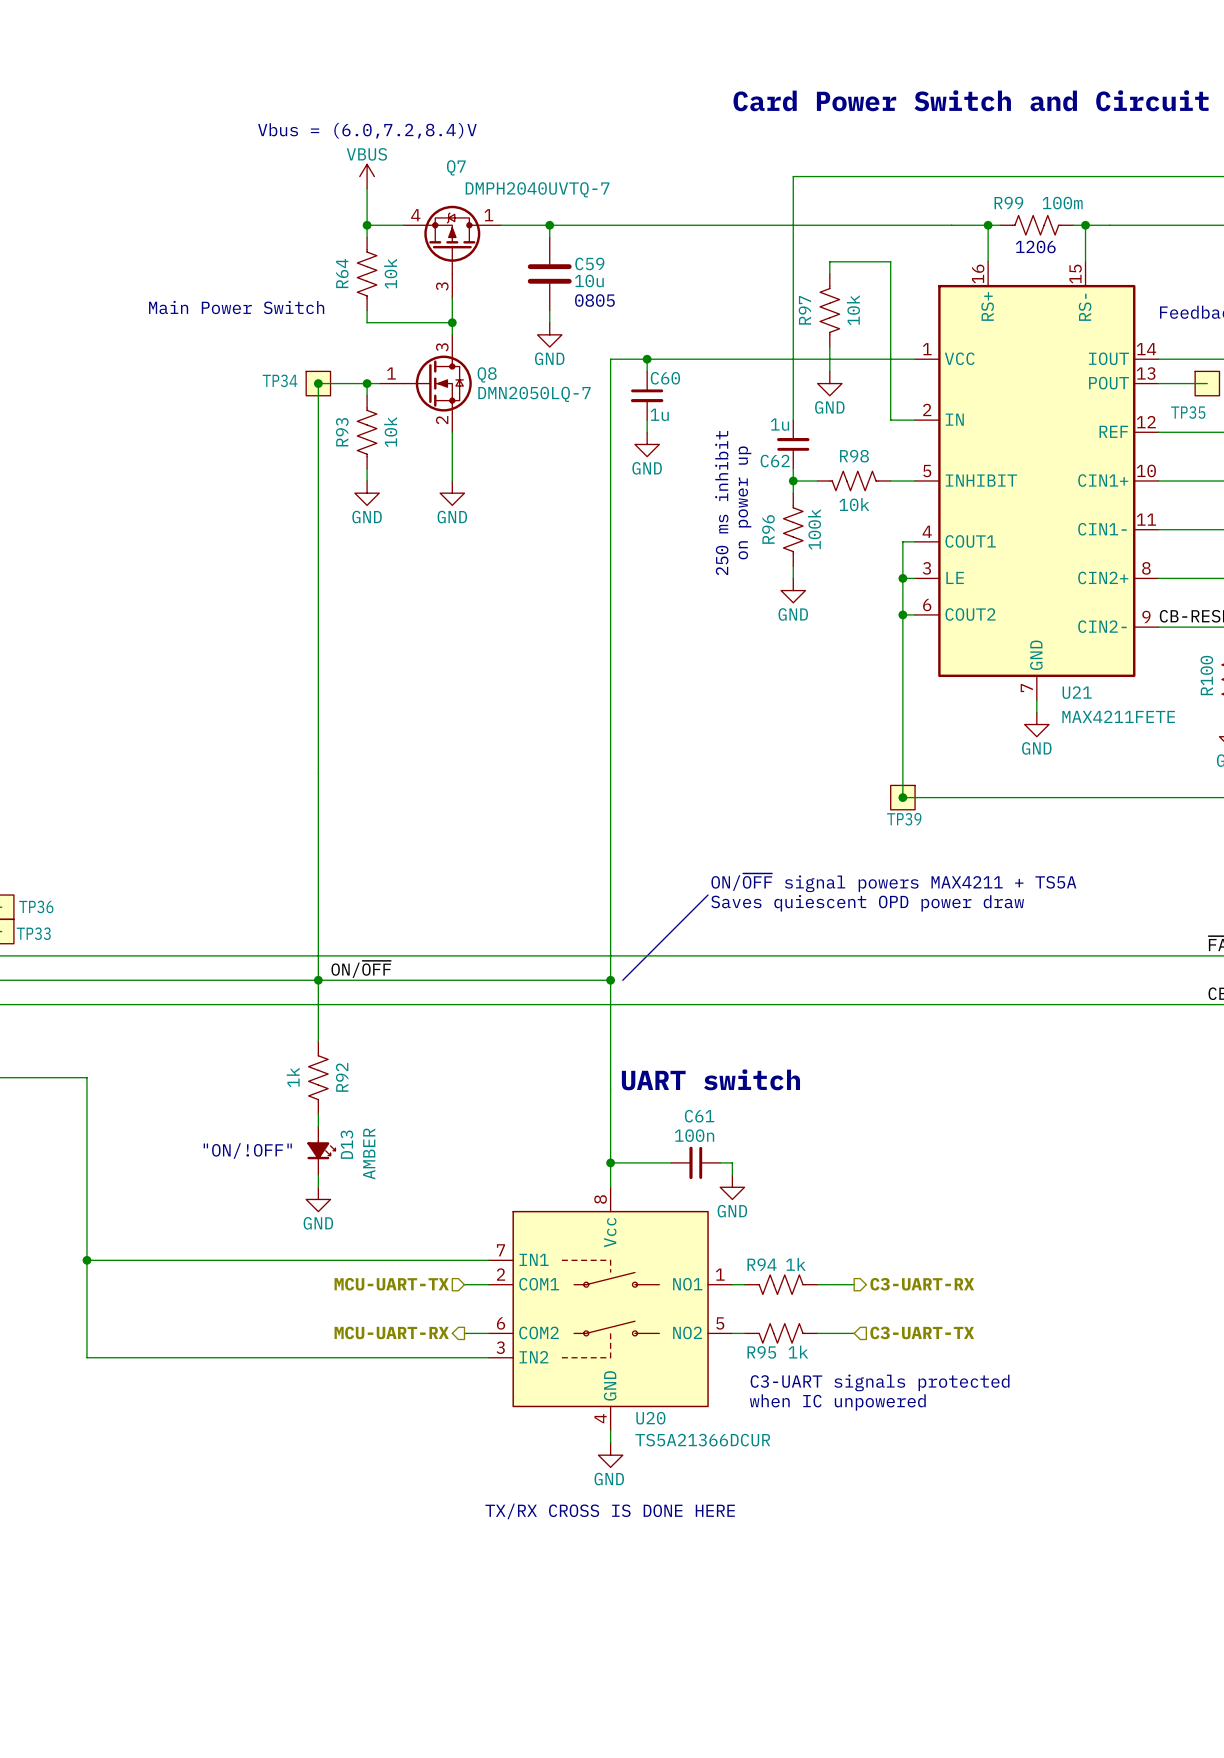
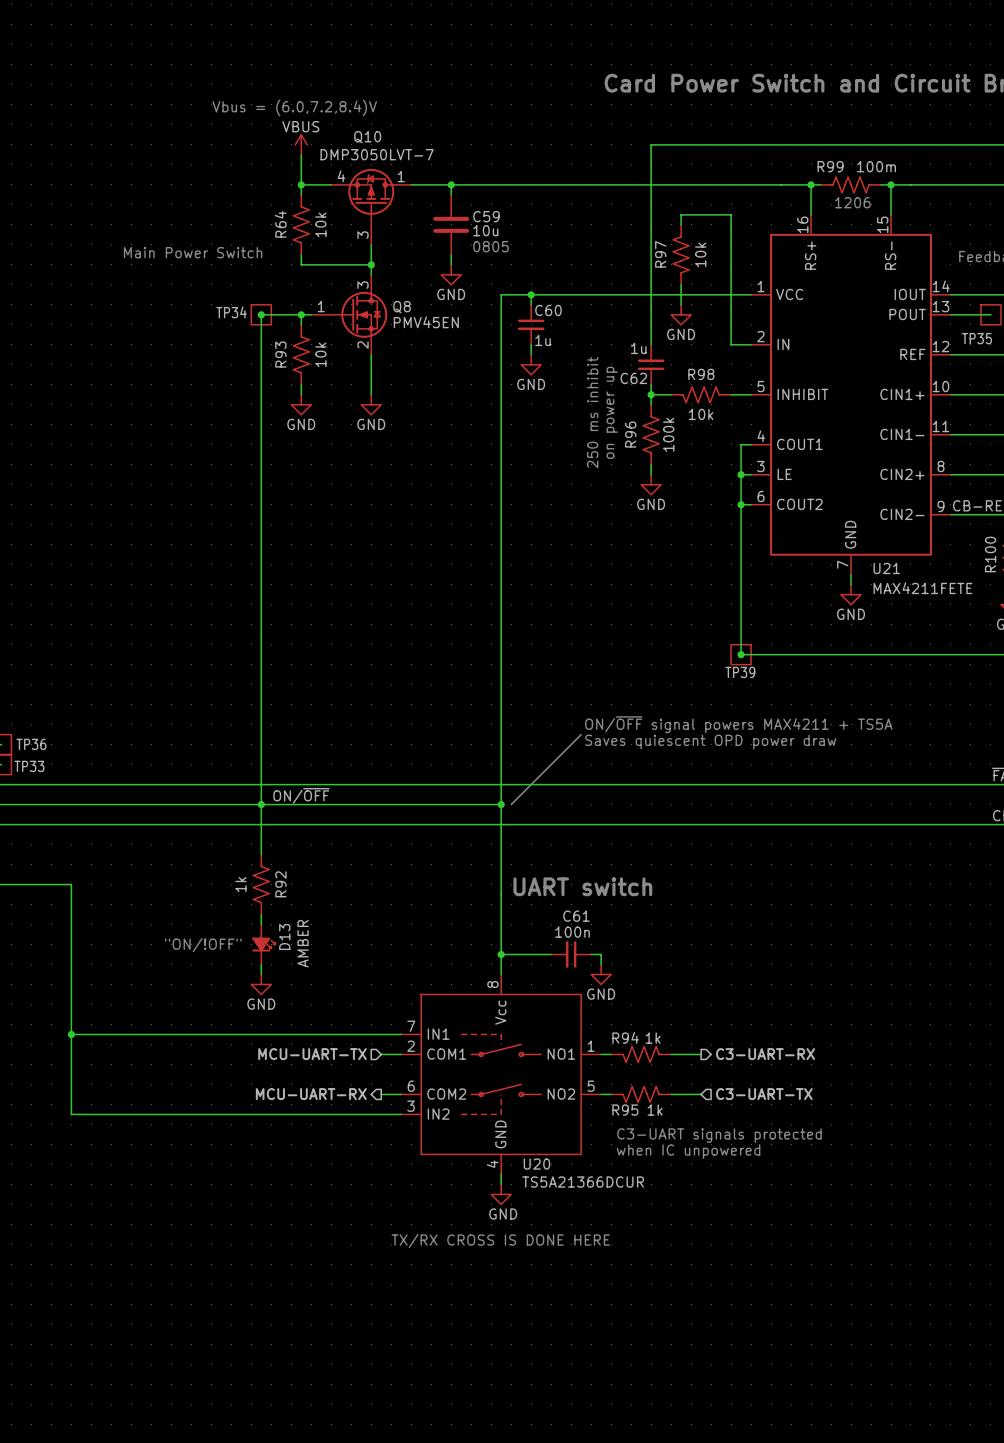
Q7 name: Q7 (456, 167) -> Q10 (367, 137)
Q7 value: DMPH2040UVTQ-7 (537, 189) -> DMP3050LVT-7 (377, 154)
Q8 value: DMN2050LQ-7 (534, 394) -> PMV45EN (426, 322)

